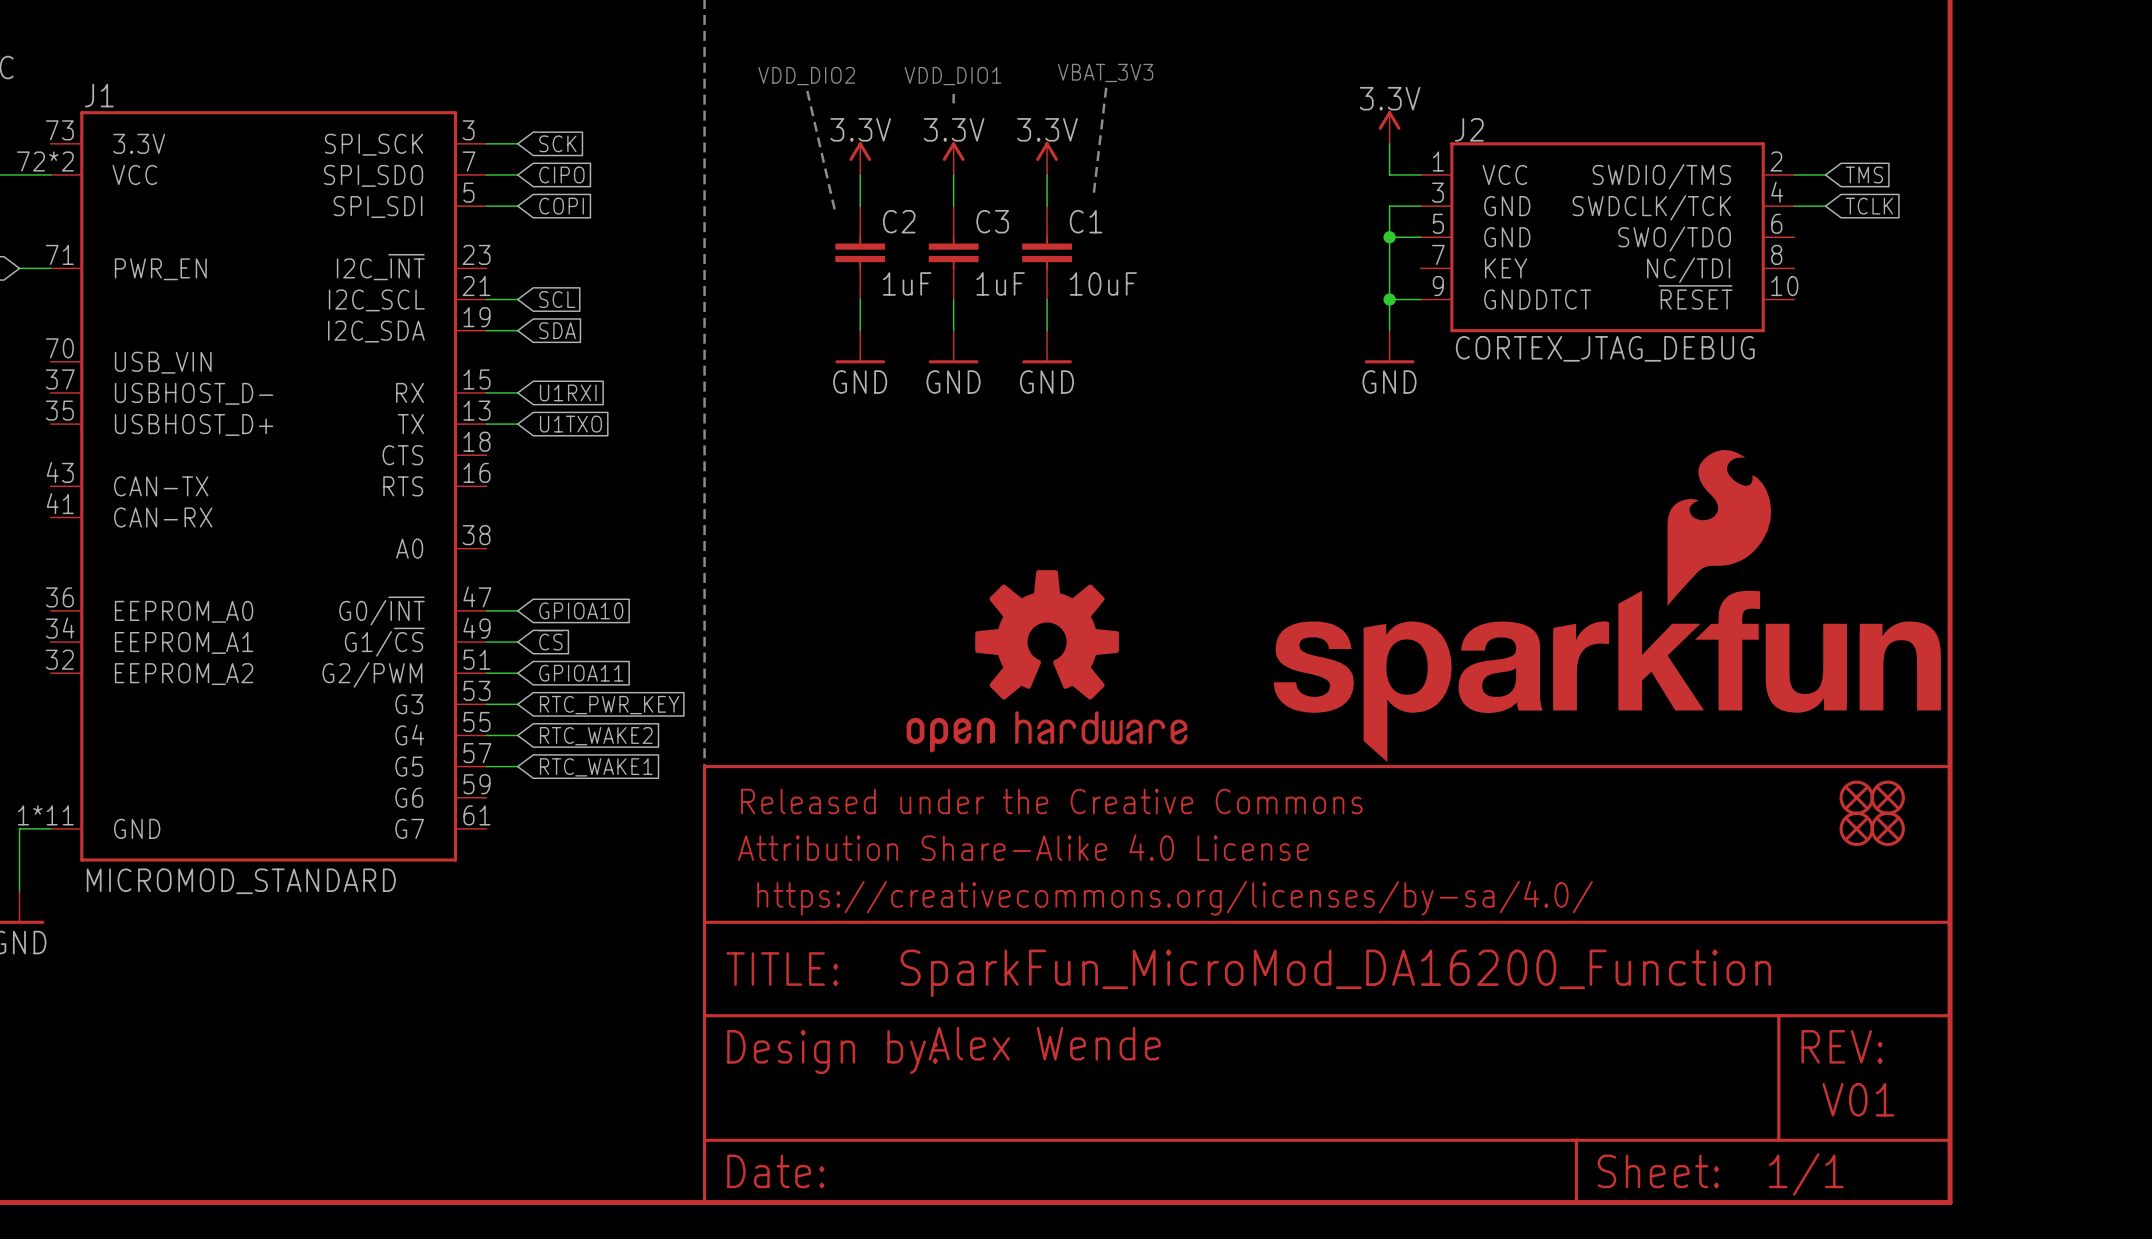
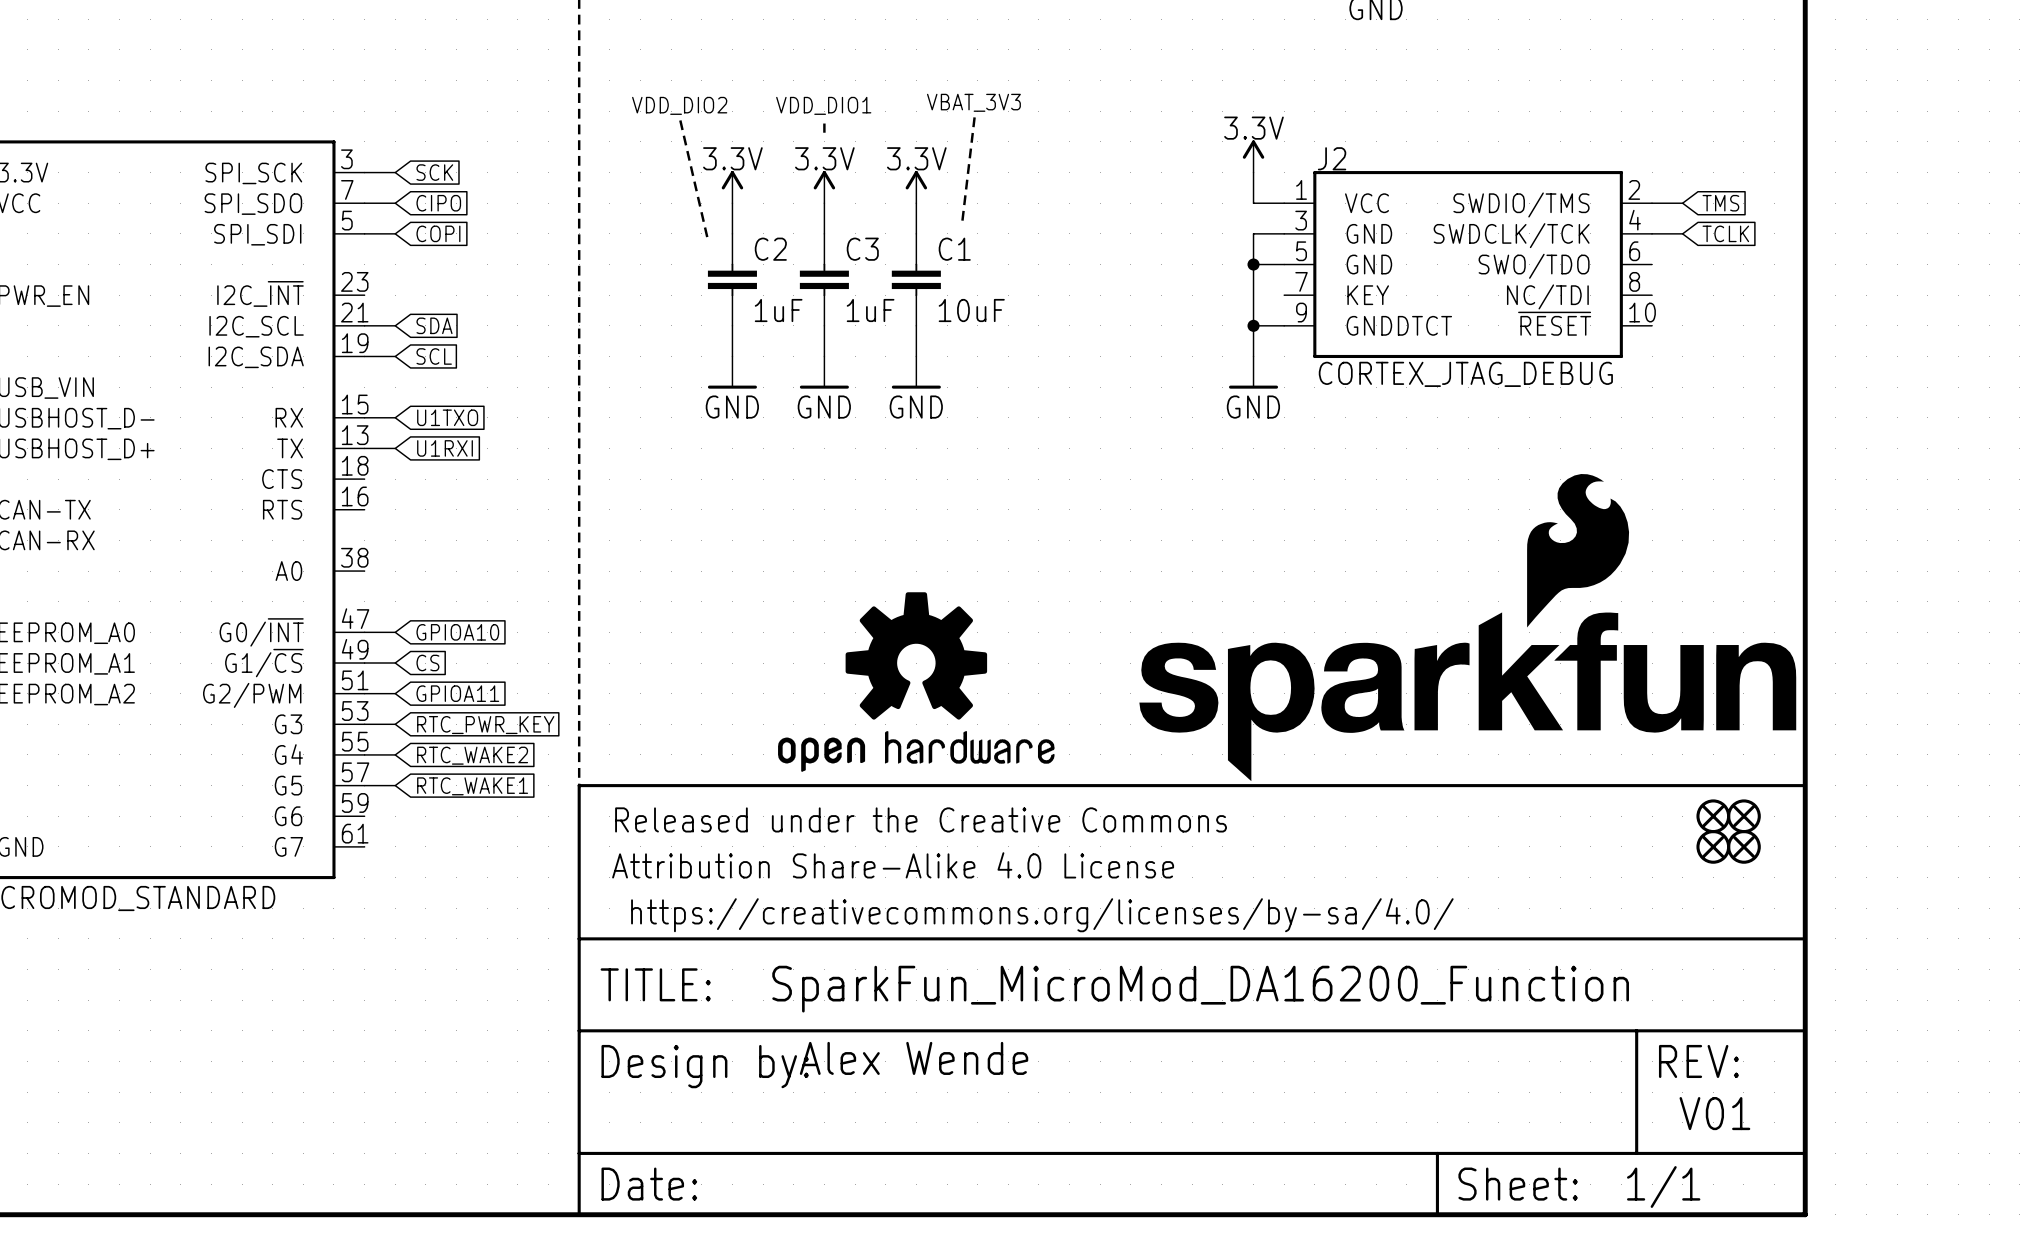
global label: SCL (557, 299) -> SDA (434, 325)
global label: SDA (557, 330) -> SCL (434, 356)
global label: U1RXI (568, 392) -> U1TXO (447, 417)
global label: U1TXO (570, 424) -> U1RXI (445, 448)
global label: ~{CS} (550, 640) -> CS (427, 663)

